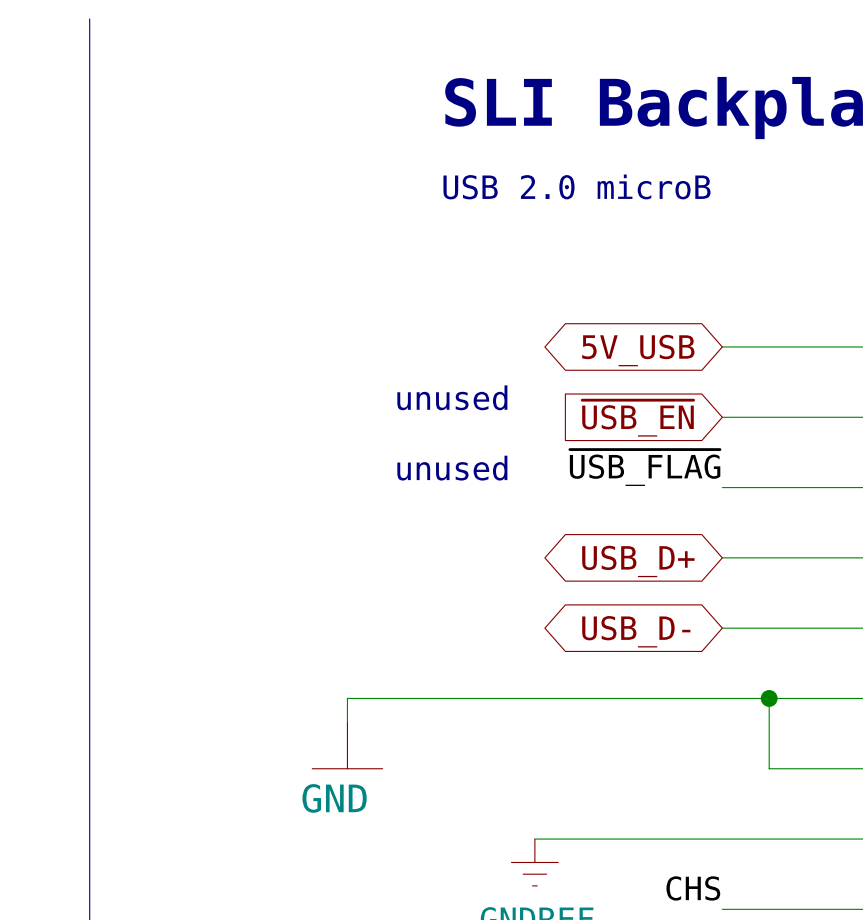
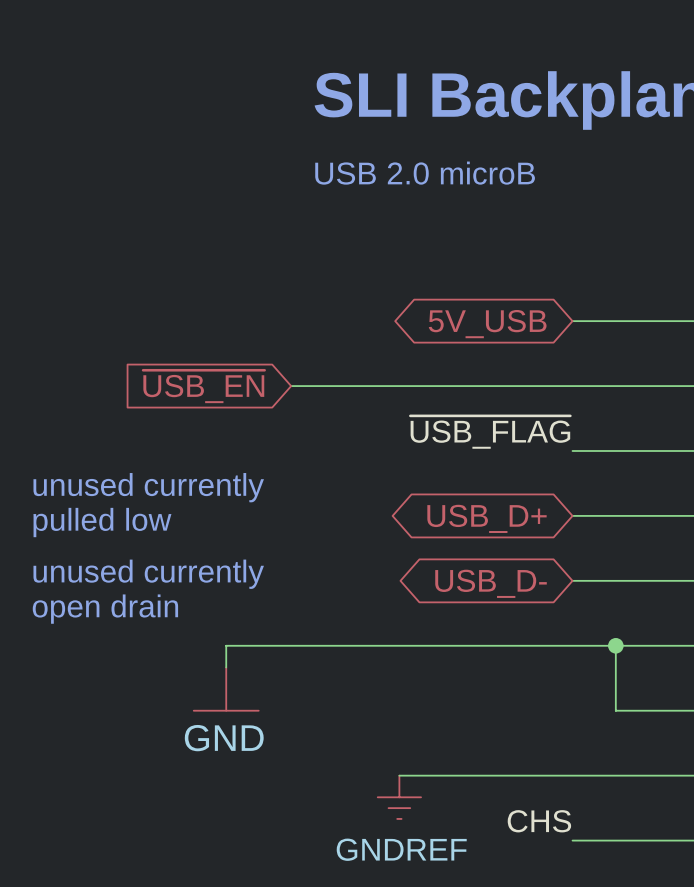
text: unused (452, 397) -> none
wire: none -> (291, 386) (572, 386)
global label position: ~{USB_EN} (637, 418) -> ~{USB_EN} (203, 386)
text: unused (452, 468) -> none
text: none -> unused currently (148, 487)
text: none -> pulled low (102, 522)
text: none -> unused currently (148, 574)
text: none -> open drain (105, 609)

